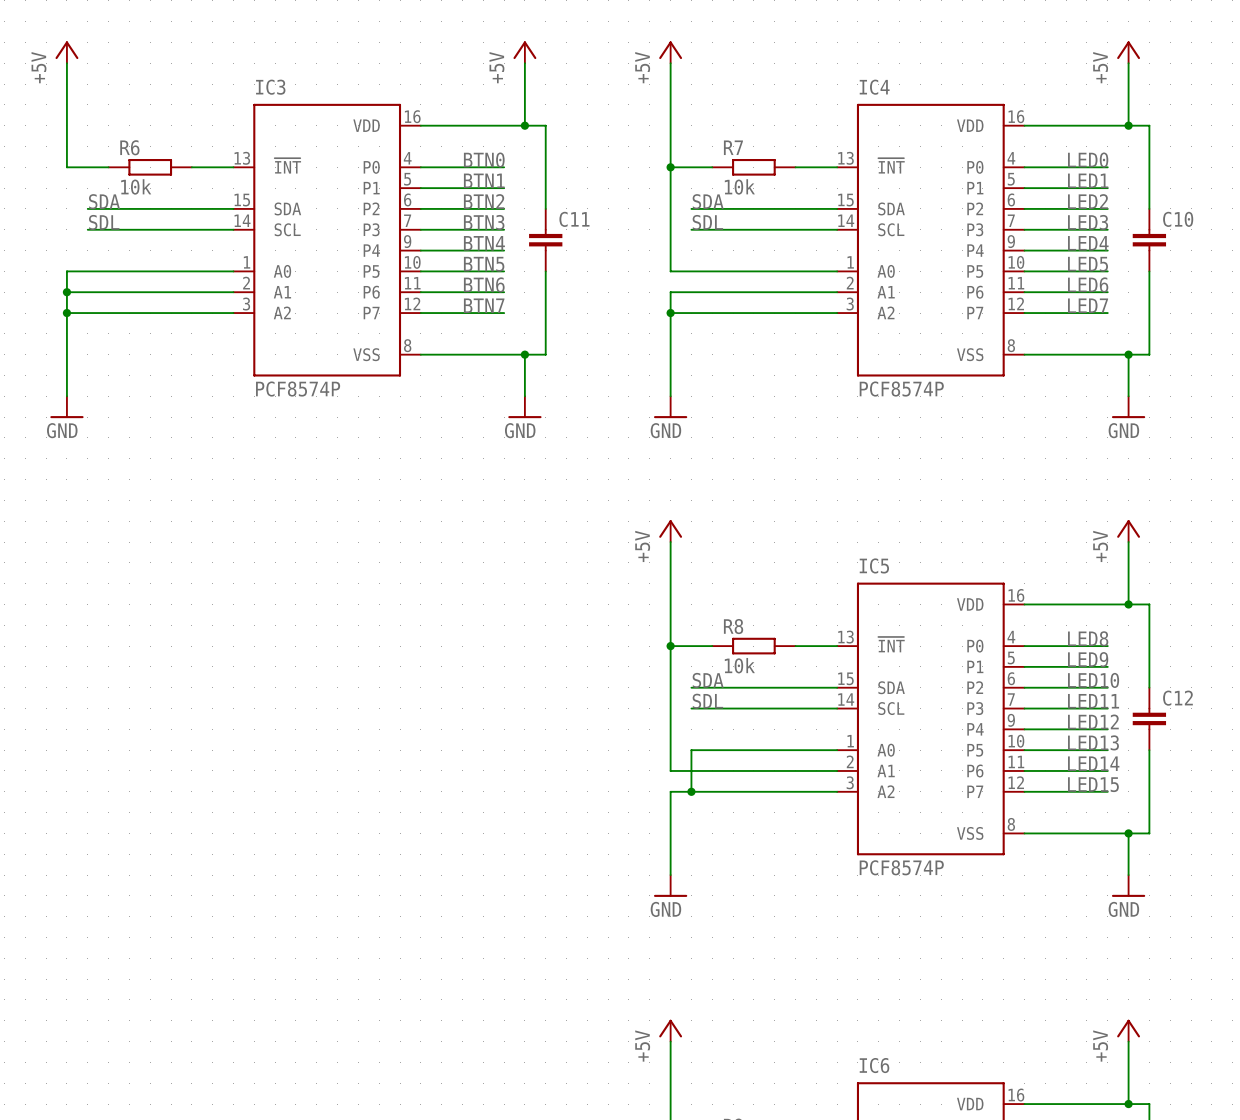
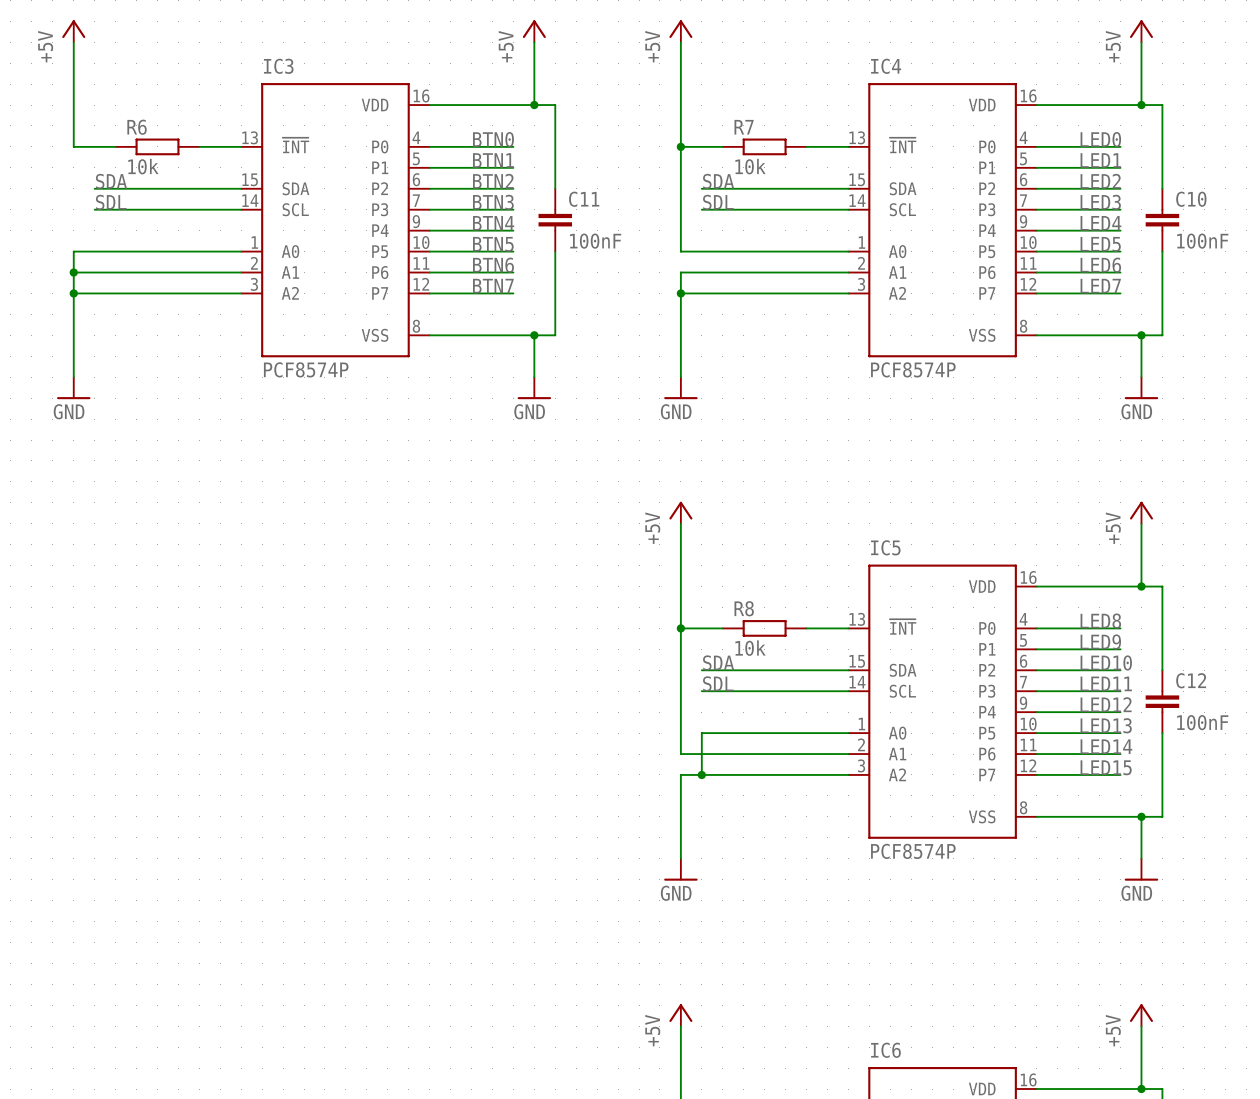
C11 value: none -> 100nF (595, 241)
C10 value: none -> 100nF (1202, 241)
C12 value: none -> 100nF (1202, 722)

